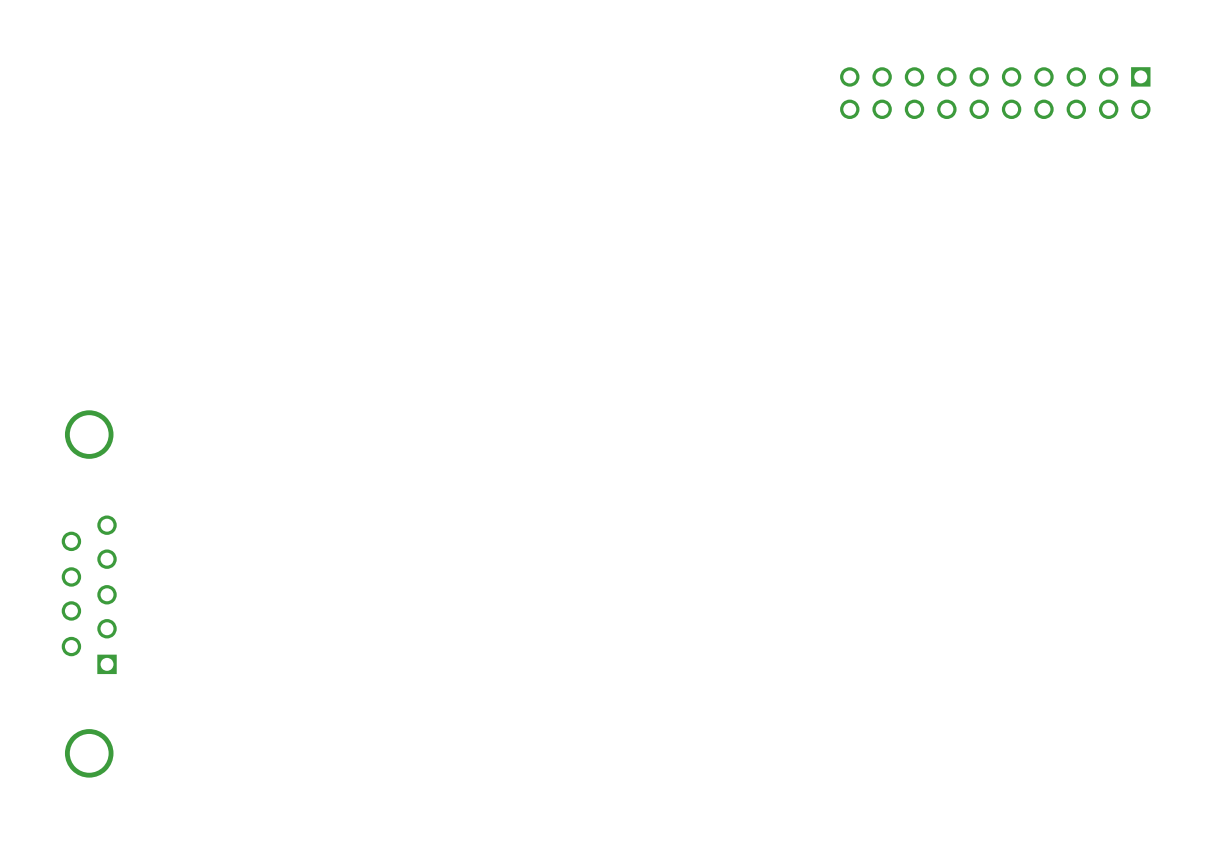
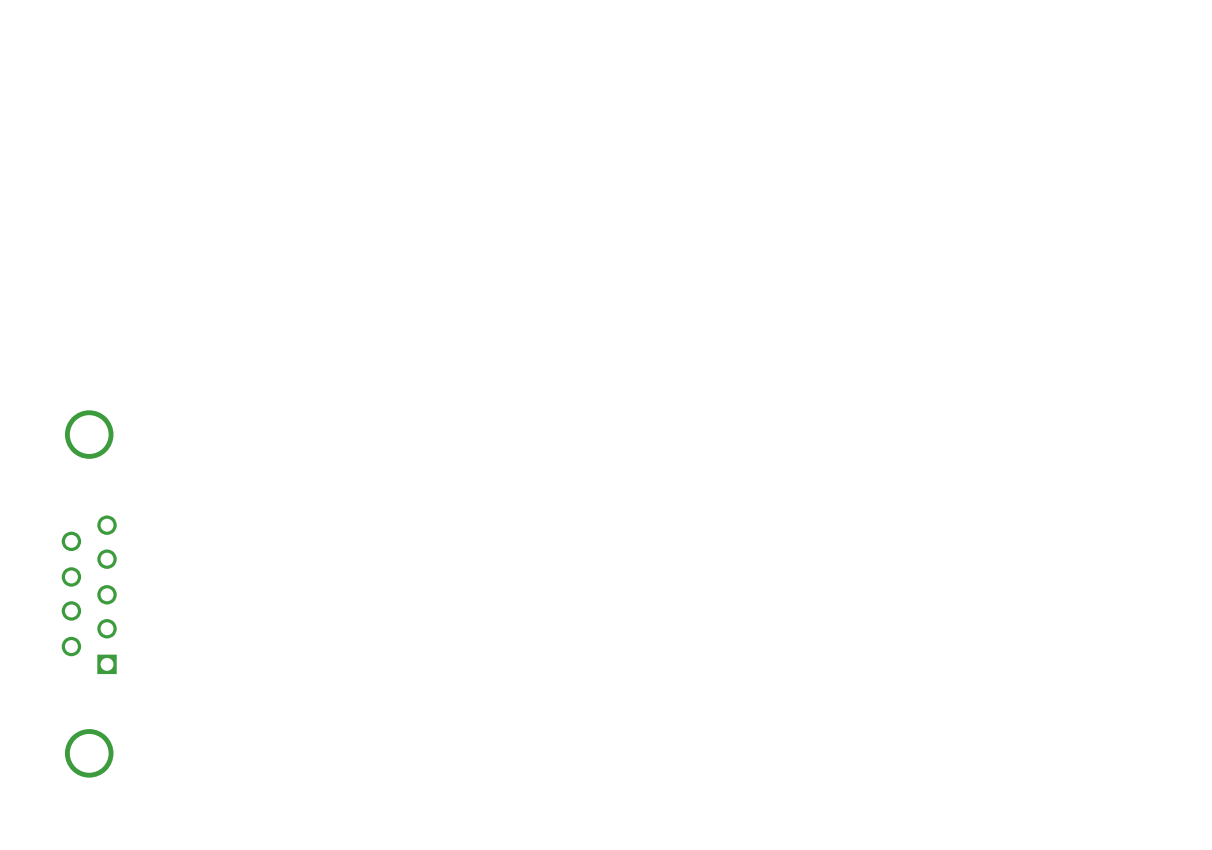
part: (995, 93) -> none

